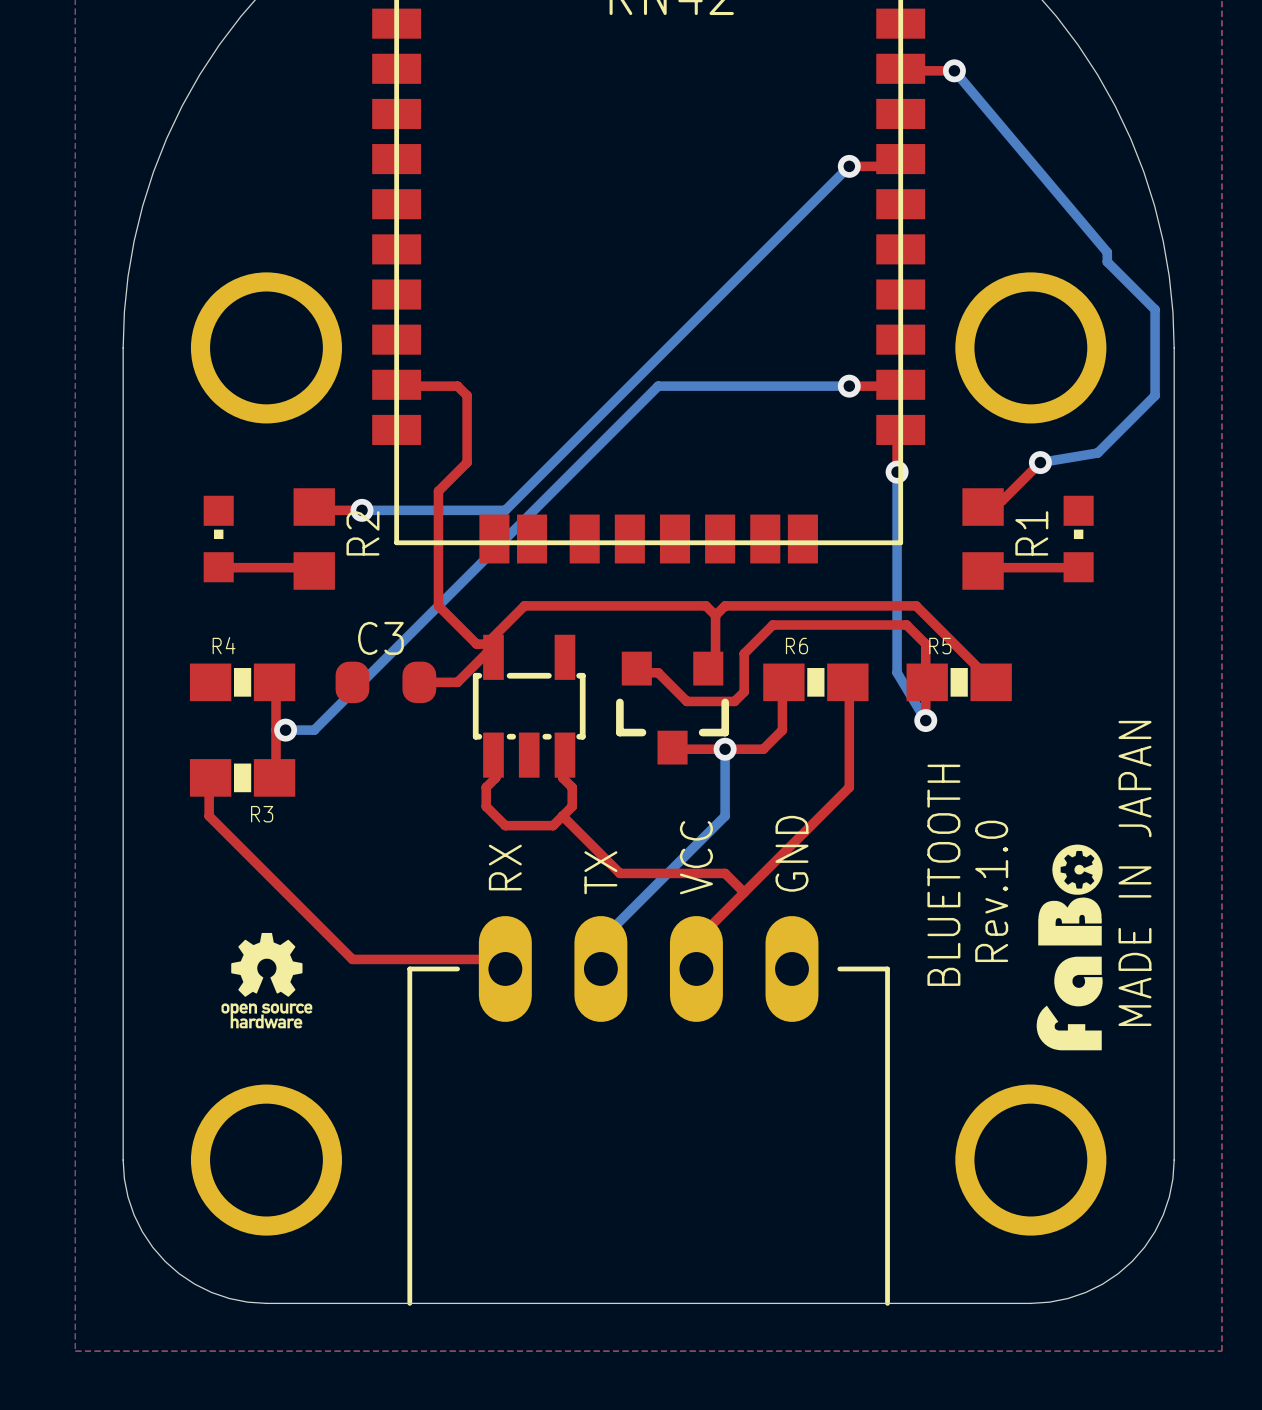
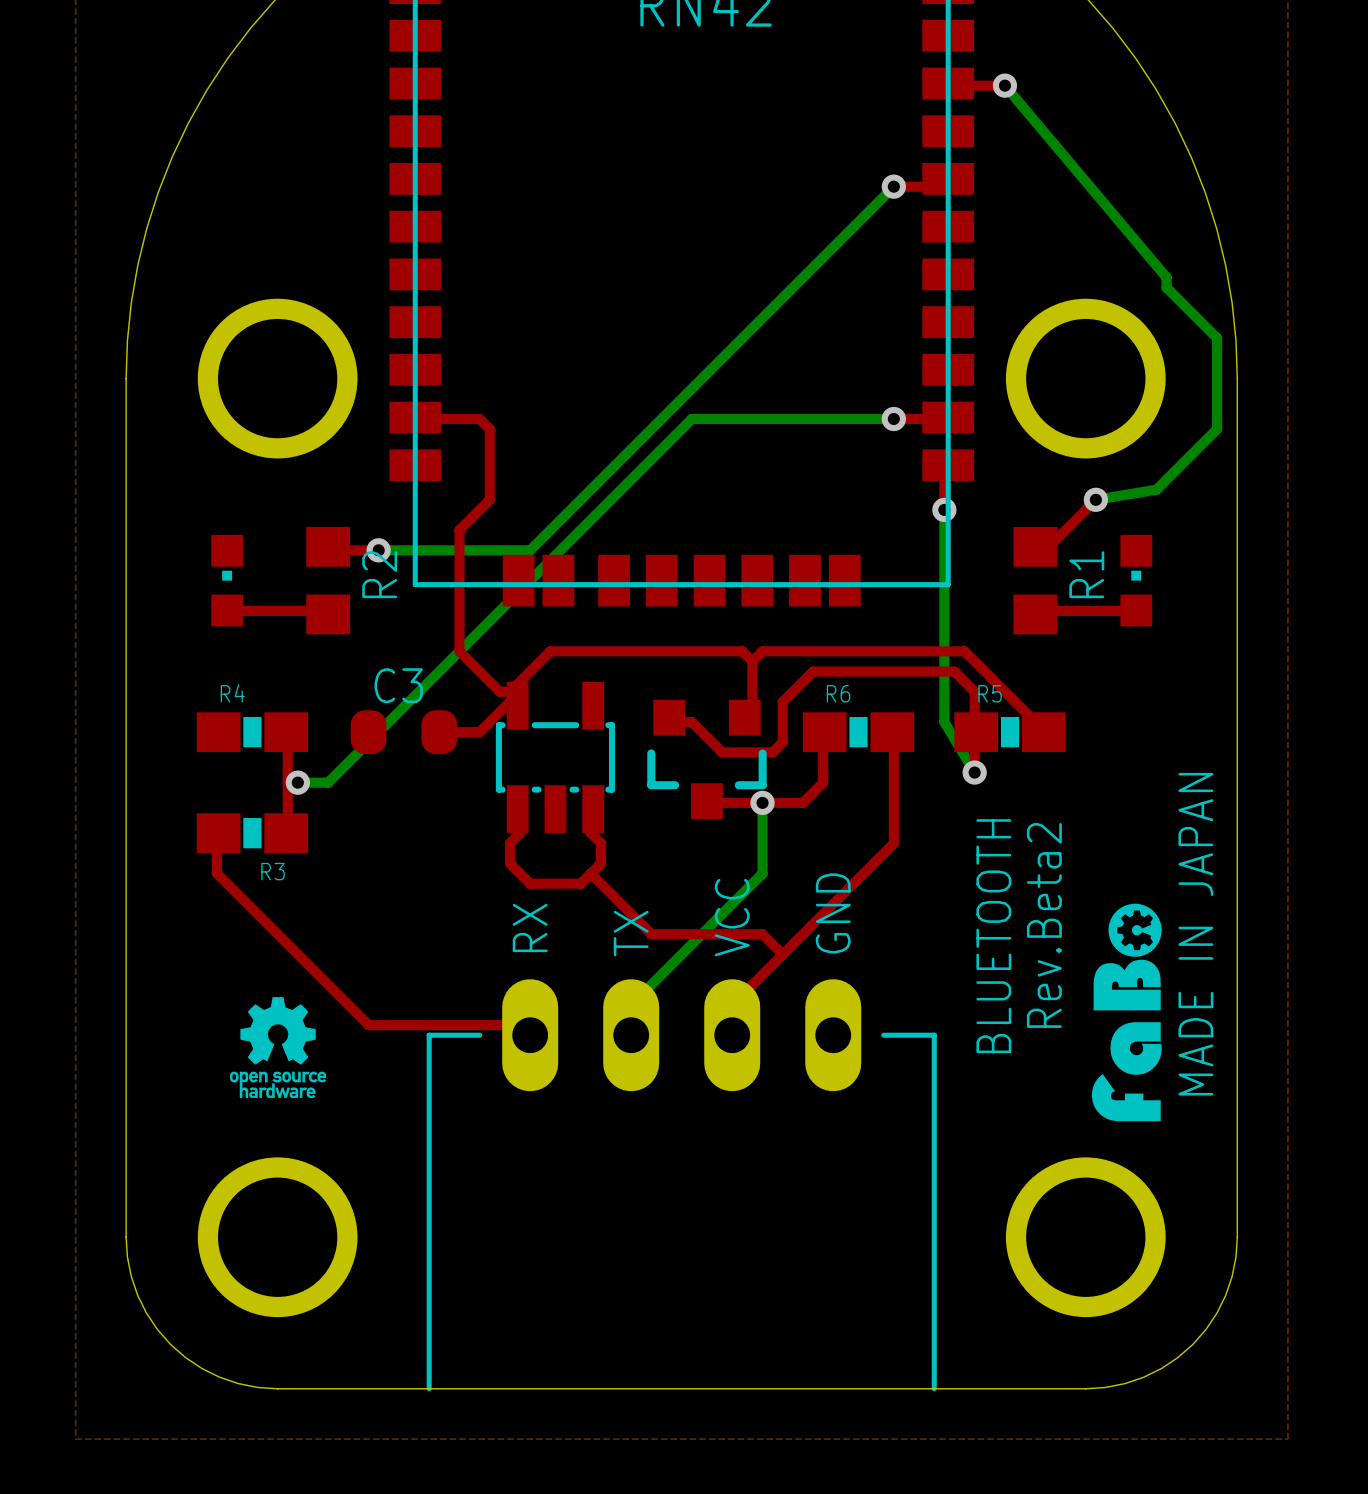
text: Rev.1.0 (991, 891) -> Rev.Beta2 (1044, 925)

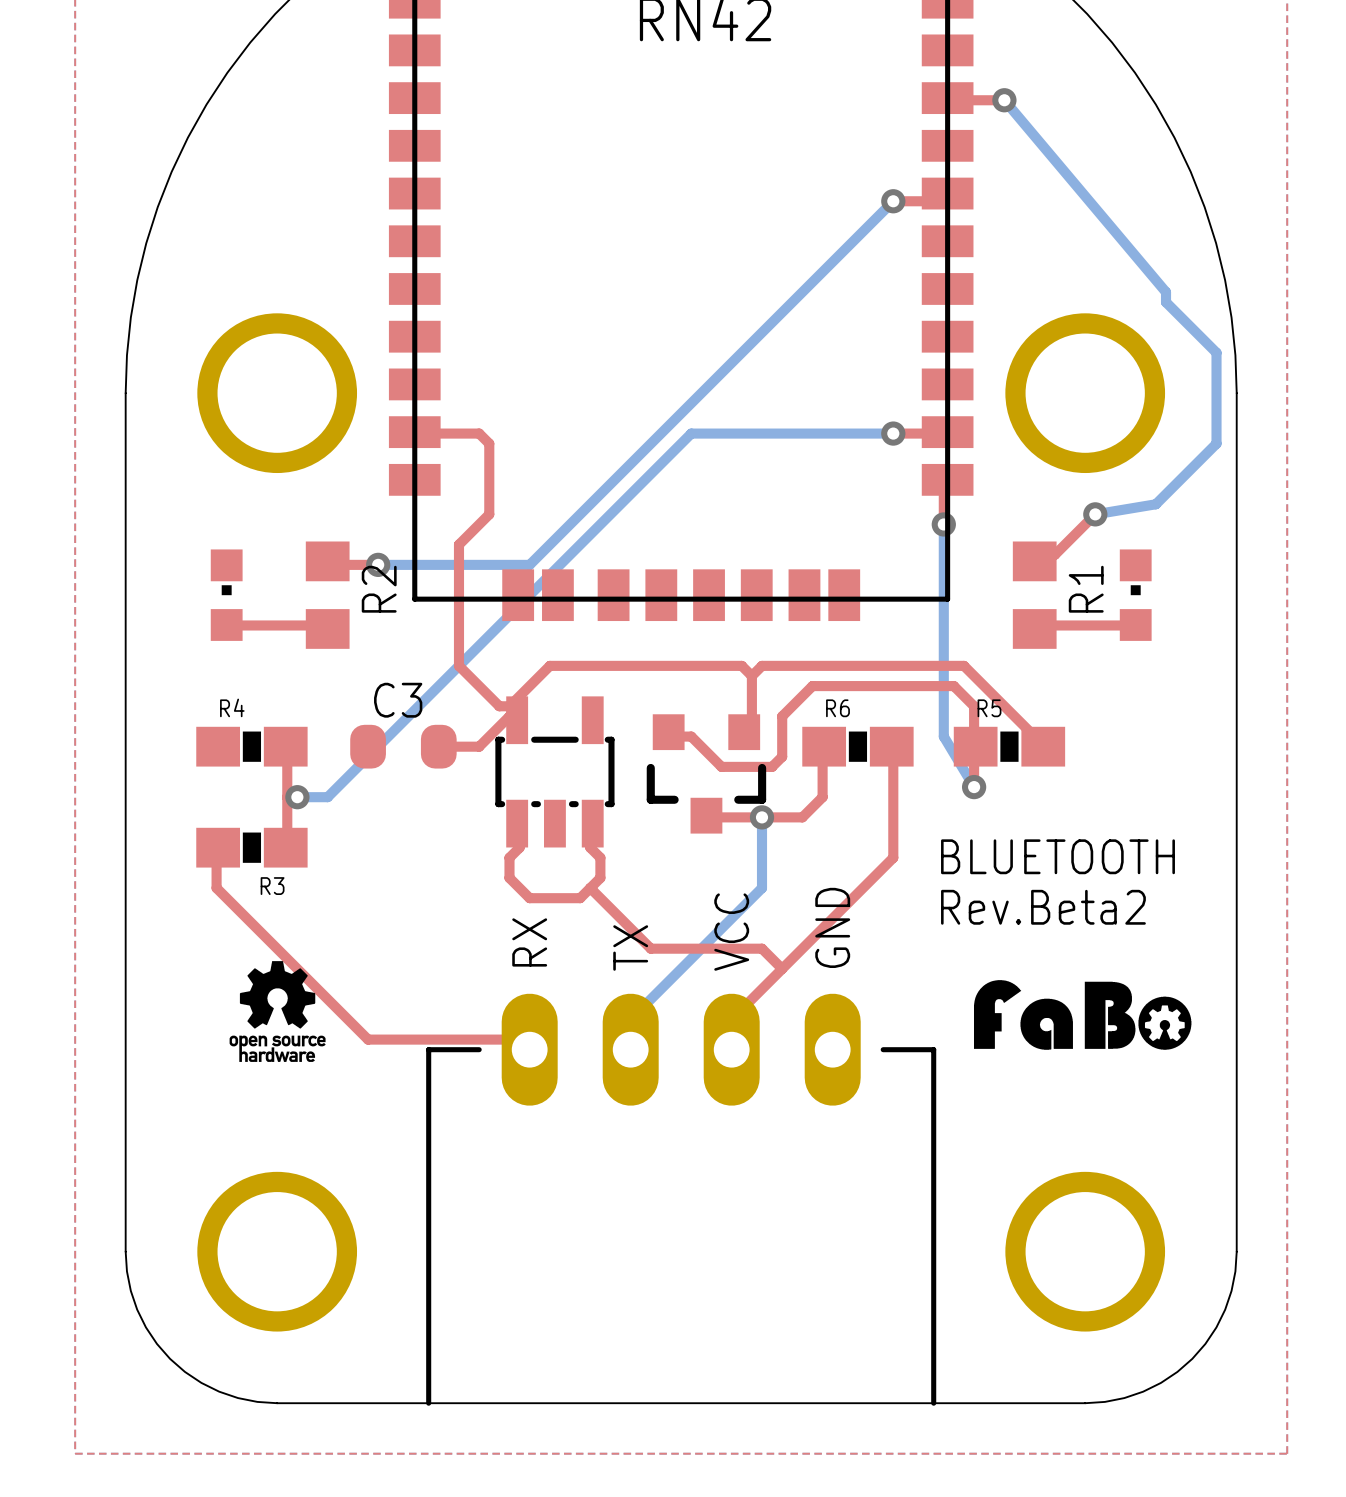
drawing: [1091, 903, 1162, 1122] -> none
text rotation: 0° (1044, 925) -> 90° clockwise (1043, 907)
text: MADE IN JAPAN (1195, 934) -> none
text rotation: 0° (993, 936) -> 90° clockwise (1058, 856)
drawing: none -> [973, 980, 1192, 1050]
drawing position: (278, 1047) -> (277, 1011)

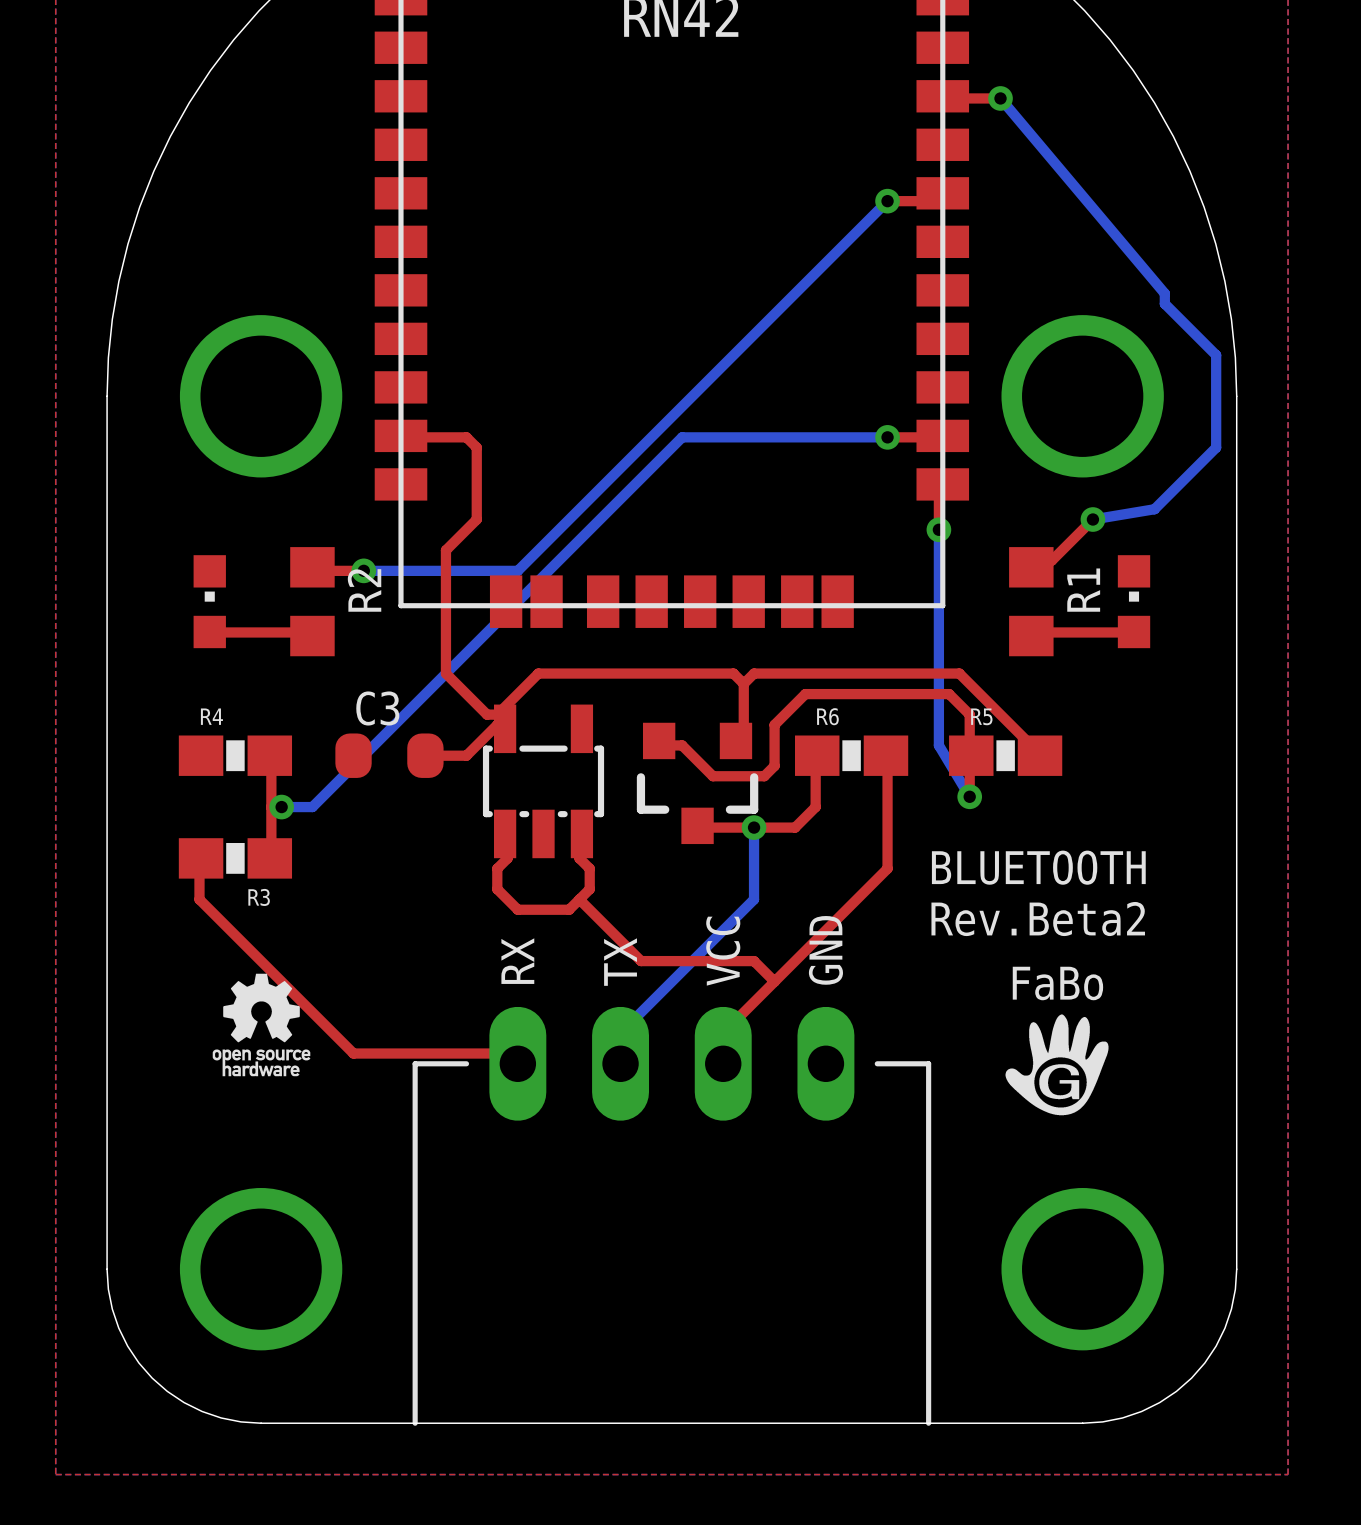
drawing: [973, 980, 1192, 1050] -> none
drawing: none -> [1005, 1014, 1109, 1116]

